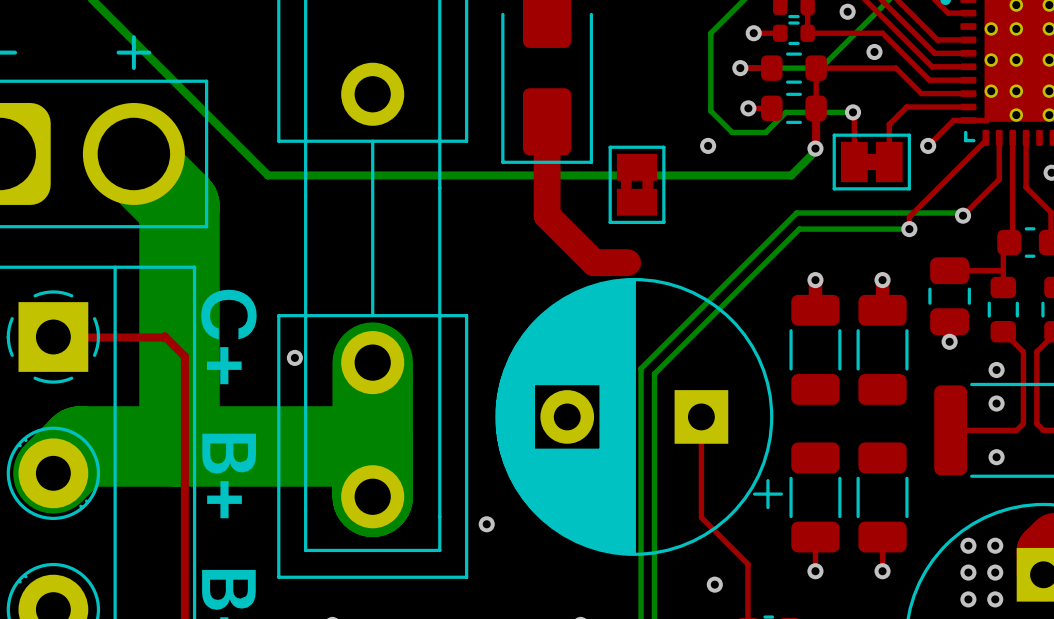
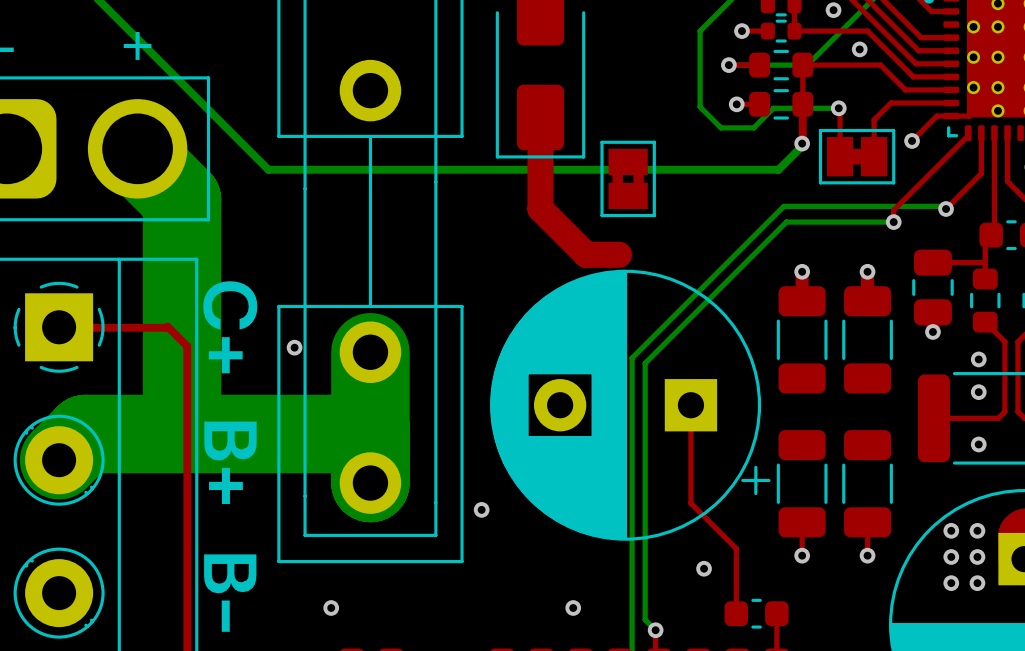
via: (708, 145) -> none

